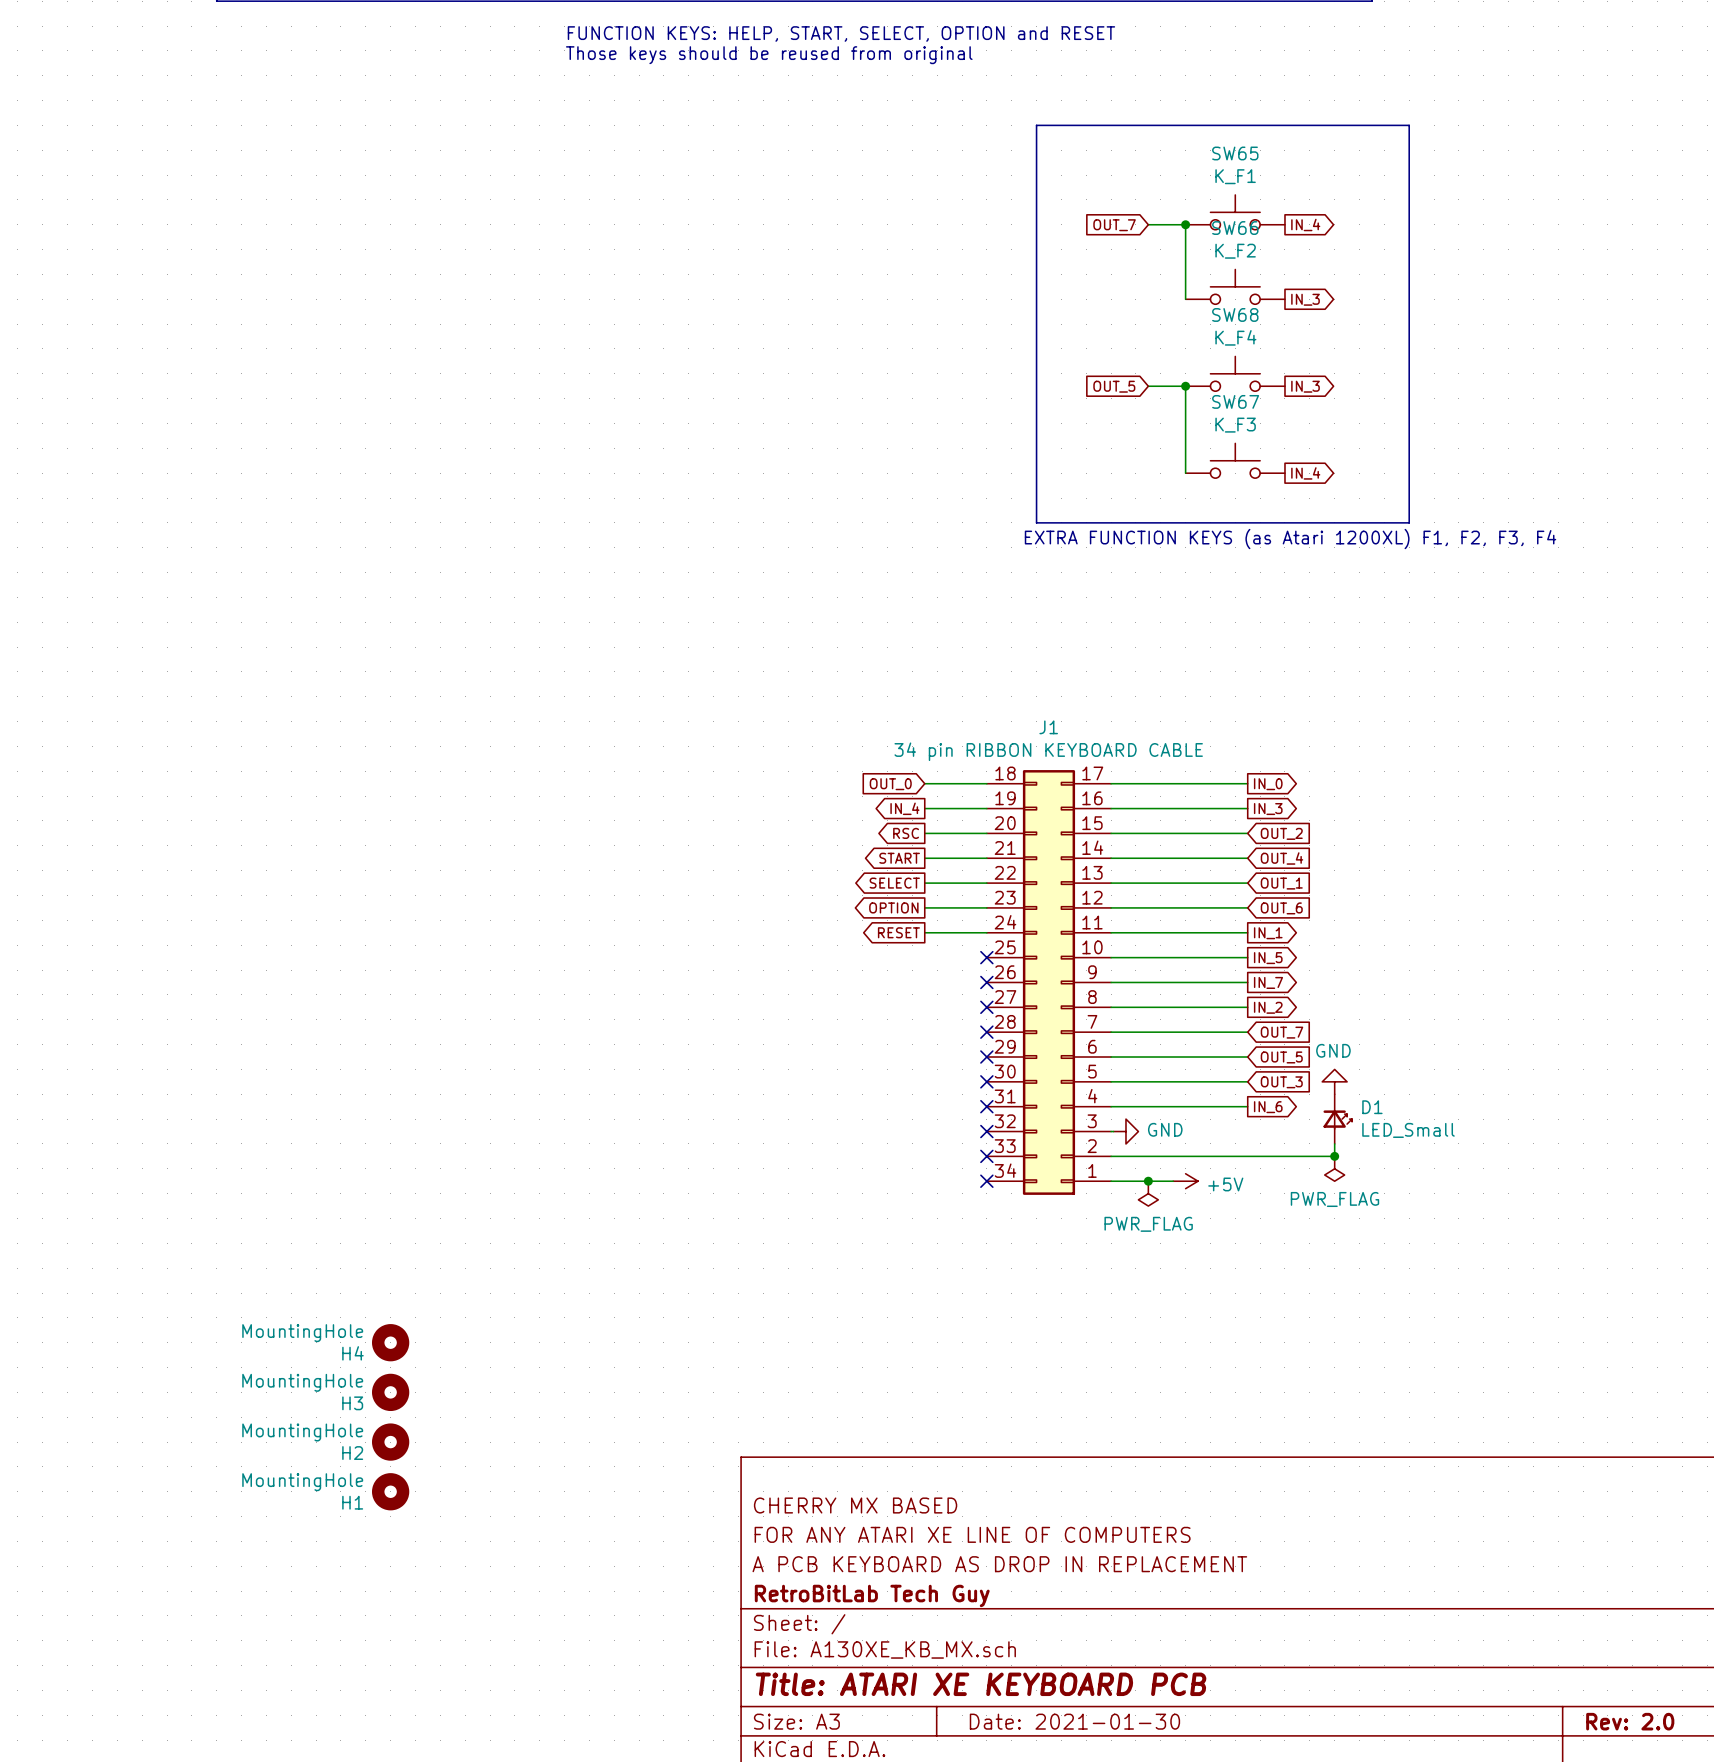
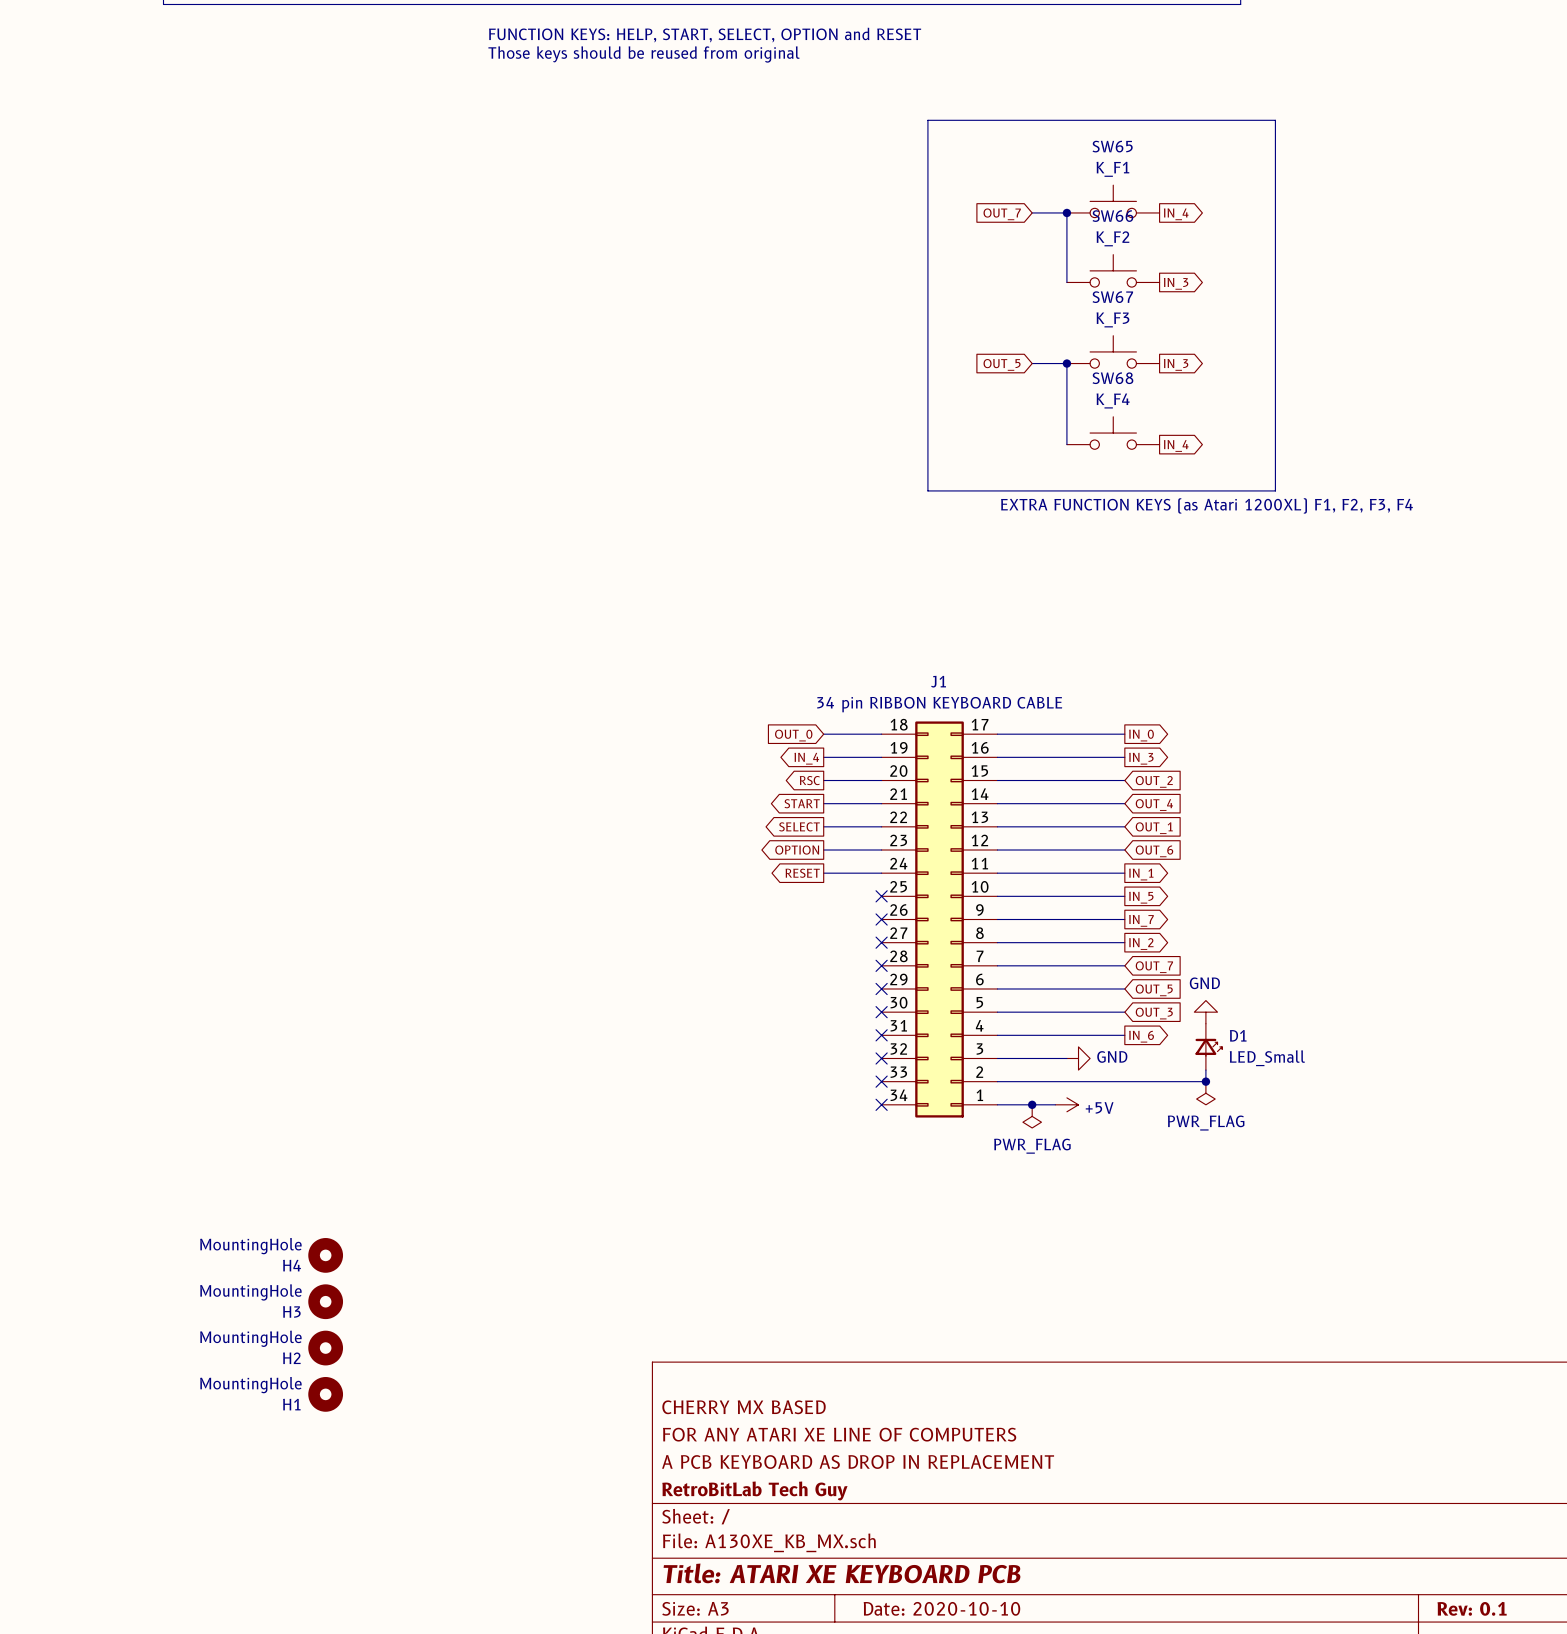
SW68 name: SW68 (1235, 314) -> SW67 (1112, 297)
SW68 value: K_F4 (1235, 337) -> K_F3 (1112, 319)
SW67 name: SW67 (1235, 401) -> SW68 (1112, 378)
SW67 value: K_F3 (1235, 425) -> K_F4 (1113, 400)
wire: none -> (999, 1058) (1066, 1058)
power symbol position: GND (1125, 1131) -> GND (1078, 1058)
title block: Date: 2021-01-30 (1074, 1721) -> Date: 2020-10-10 (941, 1608)
title block: Rev: 2.0 (1630, 1721) -> Rev: 0.1 (1472, 1608)

